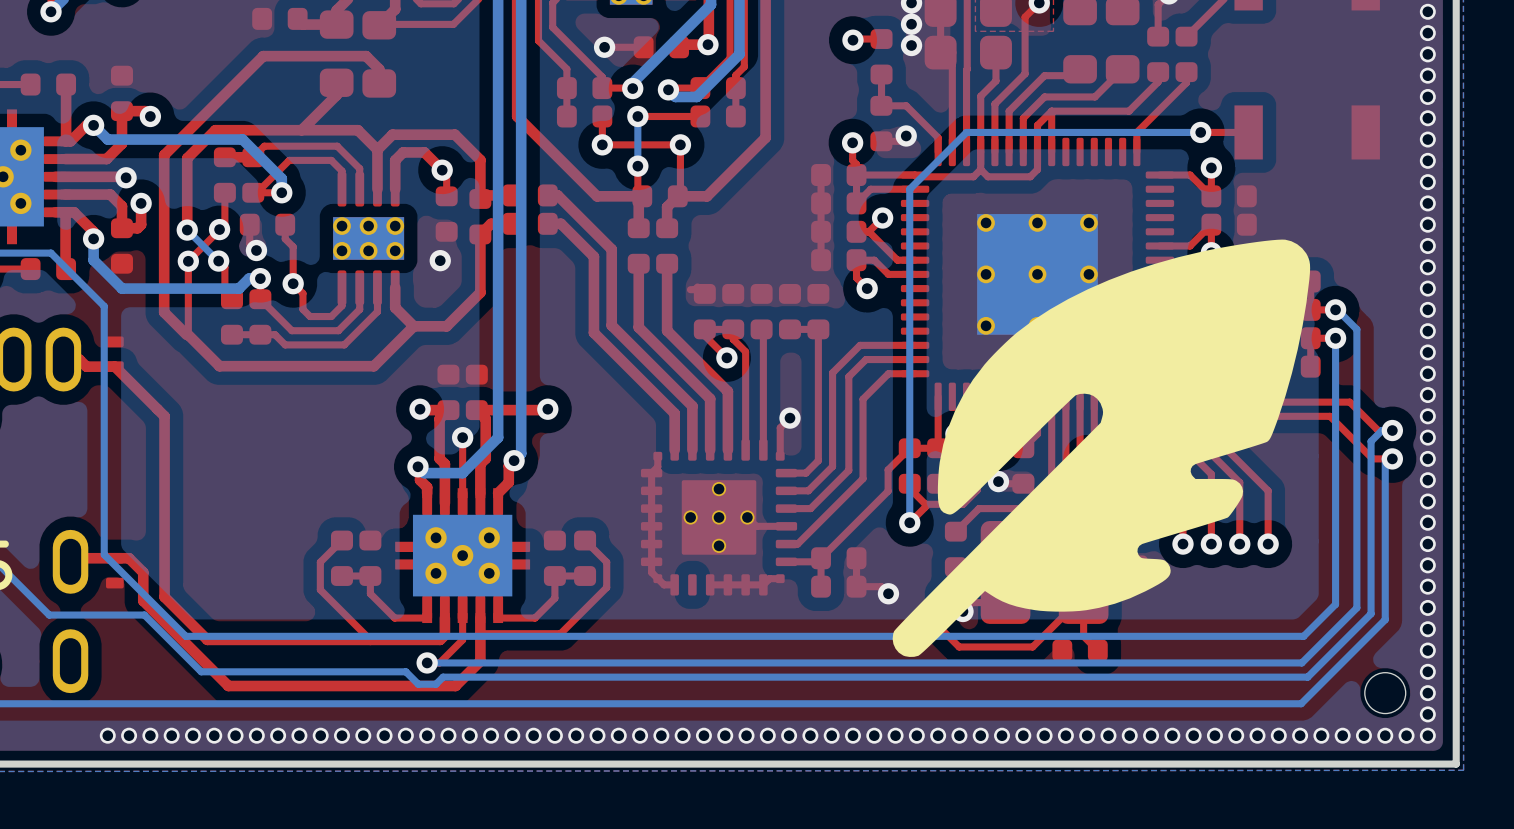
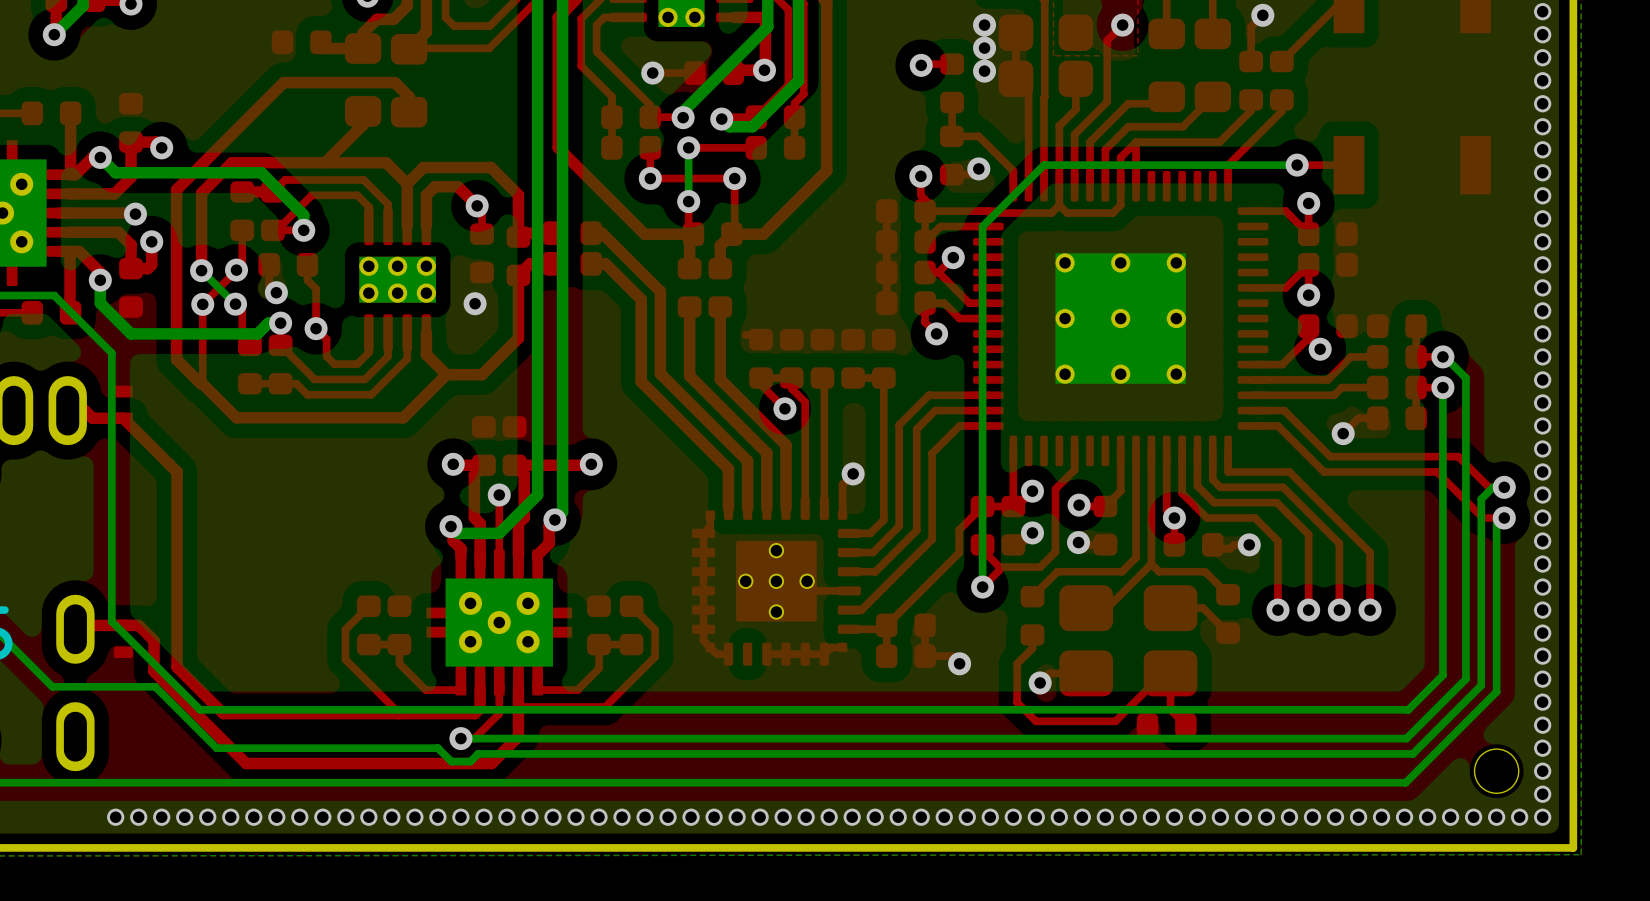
drawing: [892, 239, 1311, 657] -> none

